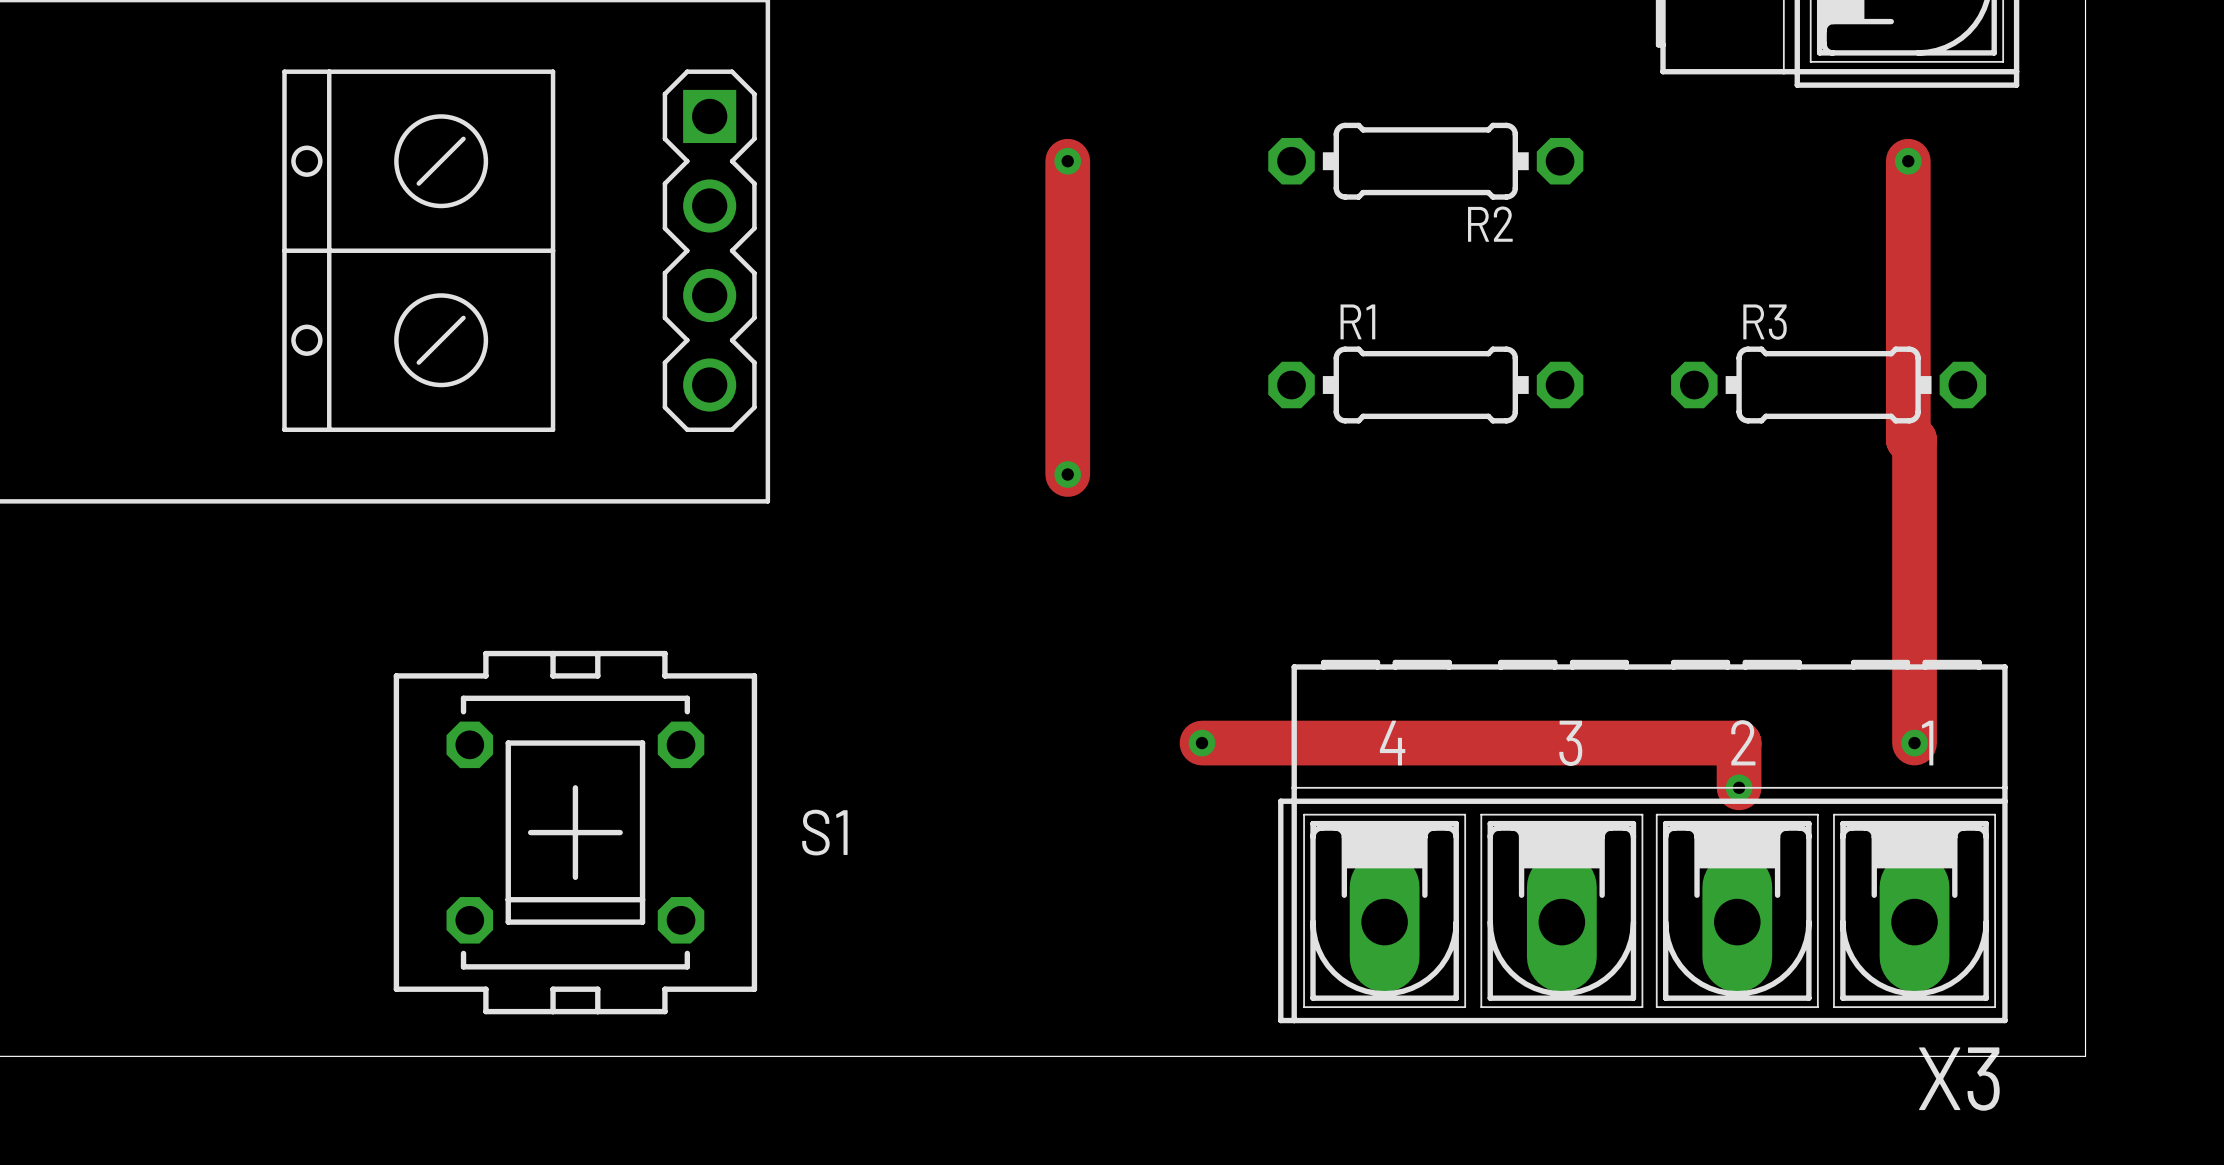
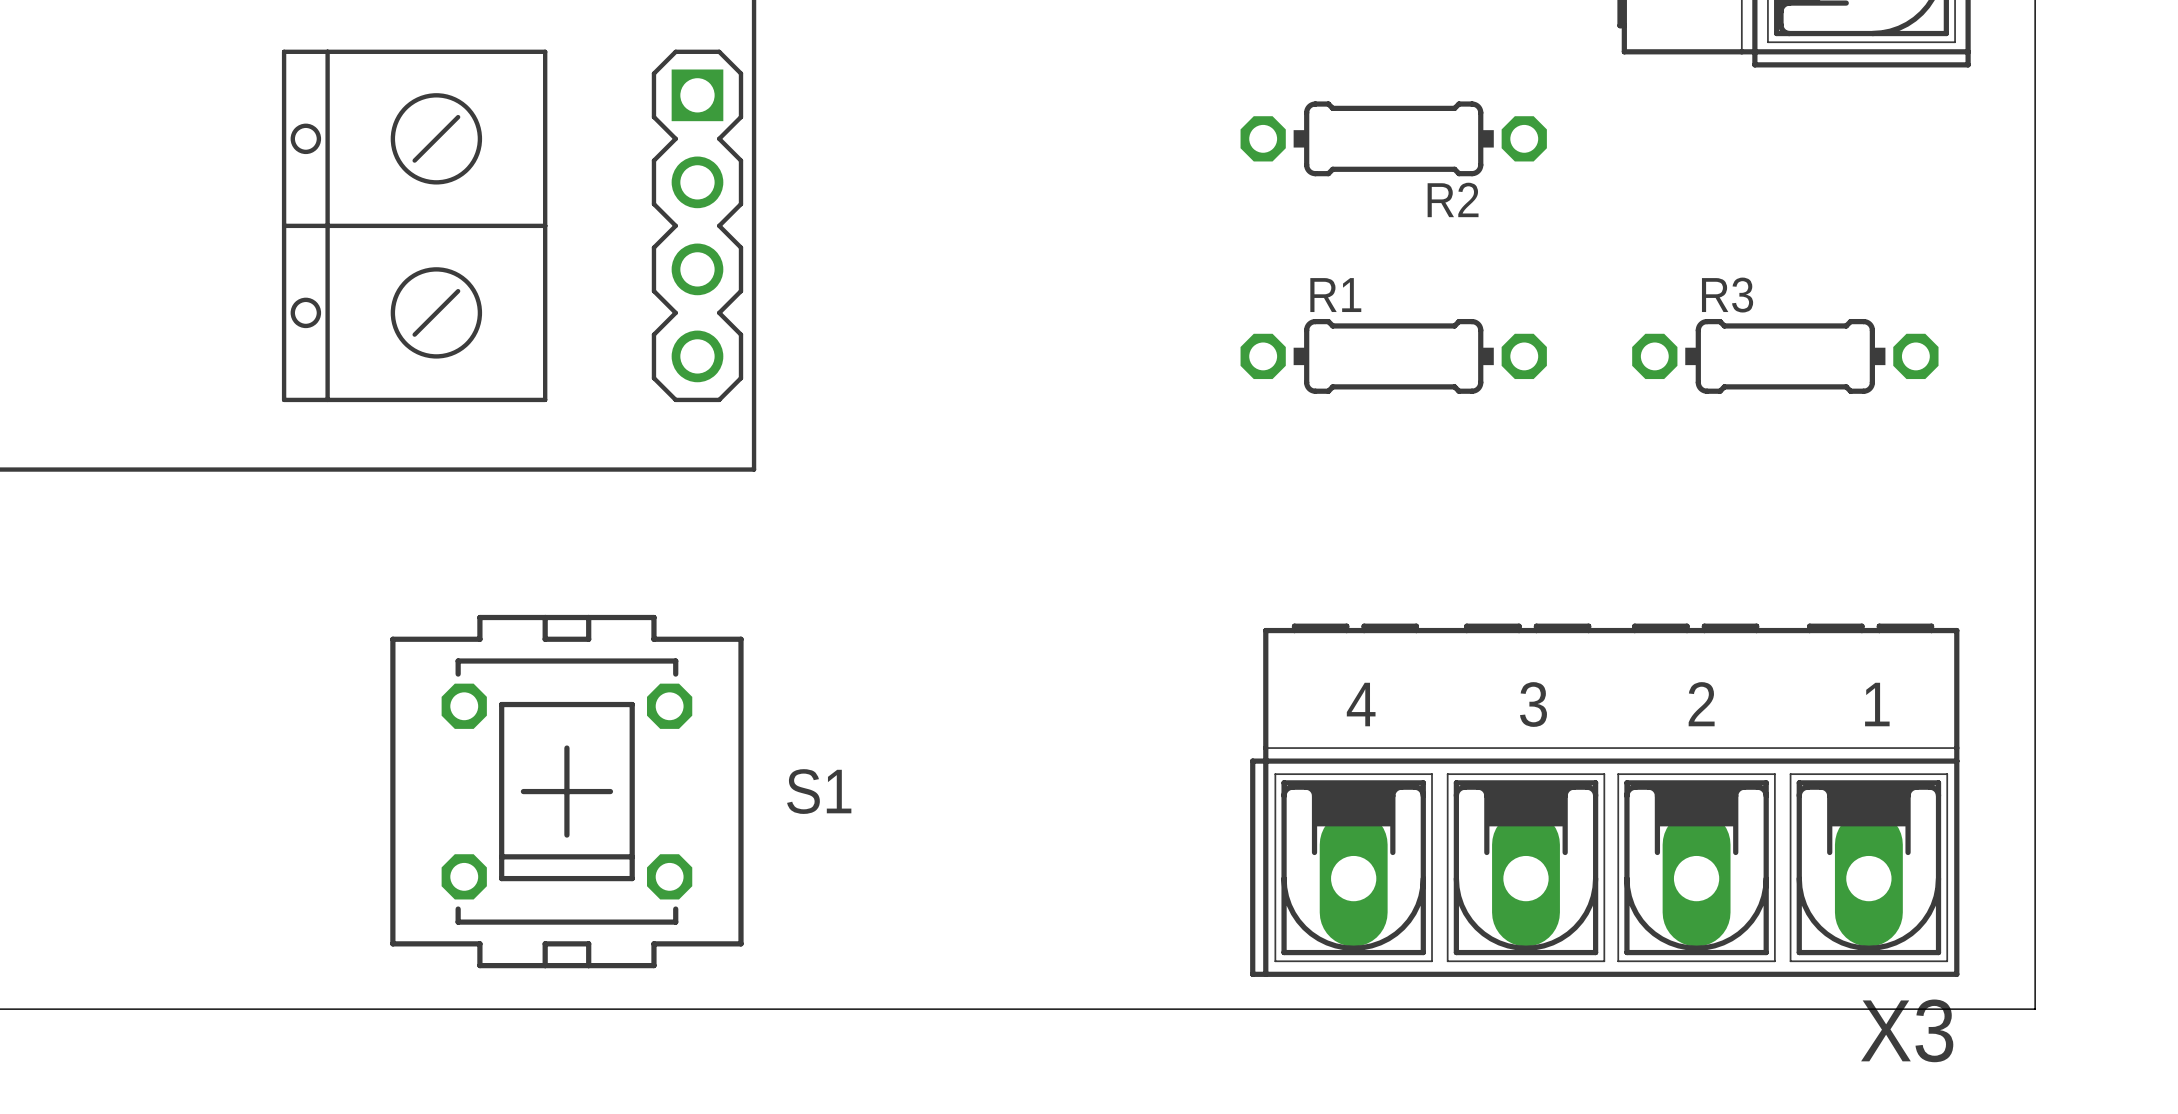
track: (1067, 161) (1067, 474) -> none
via: (1067, 161) -> none
track: (1908, 161) (1908, 439) (1914, 439) (1914, 743) -> none
via: (1908, 161) -> none
via: (1067, 474) -> none
track: (1202, 743) (1739, 743) (1739, 787) -> none
via: (1202, 743) -> none
via: (1914, 743) -> none
via: (1739, 787) -> none

